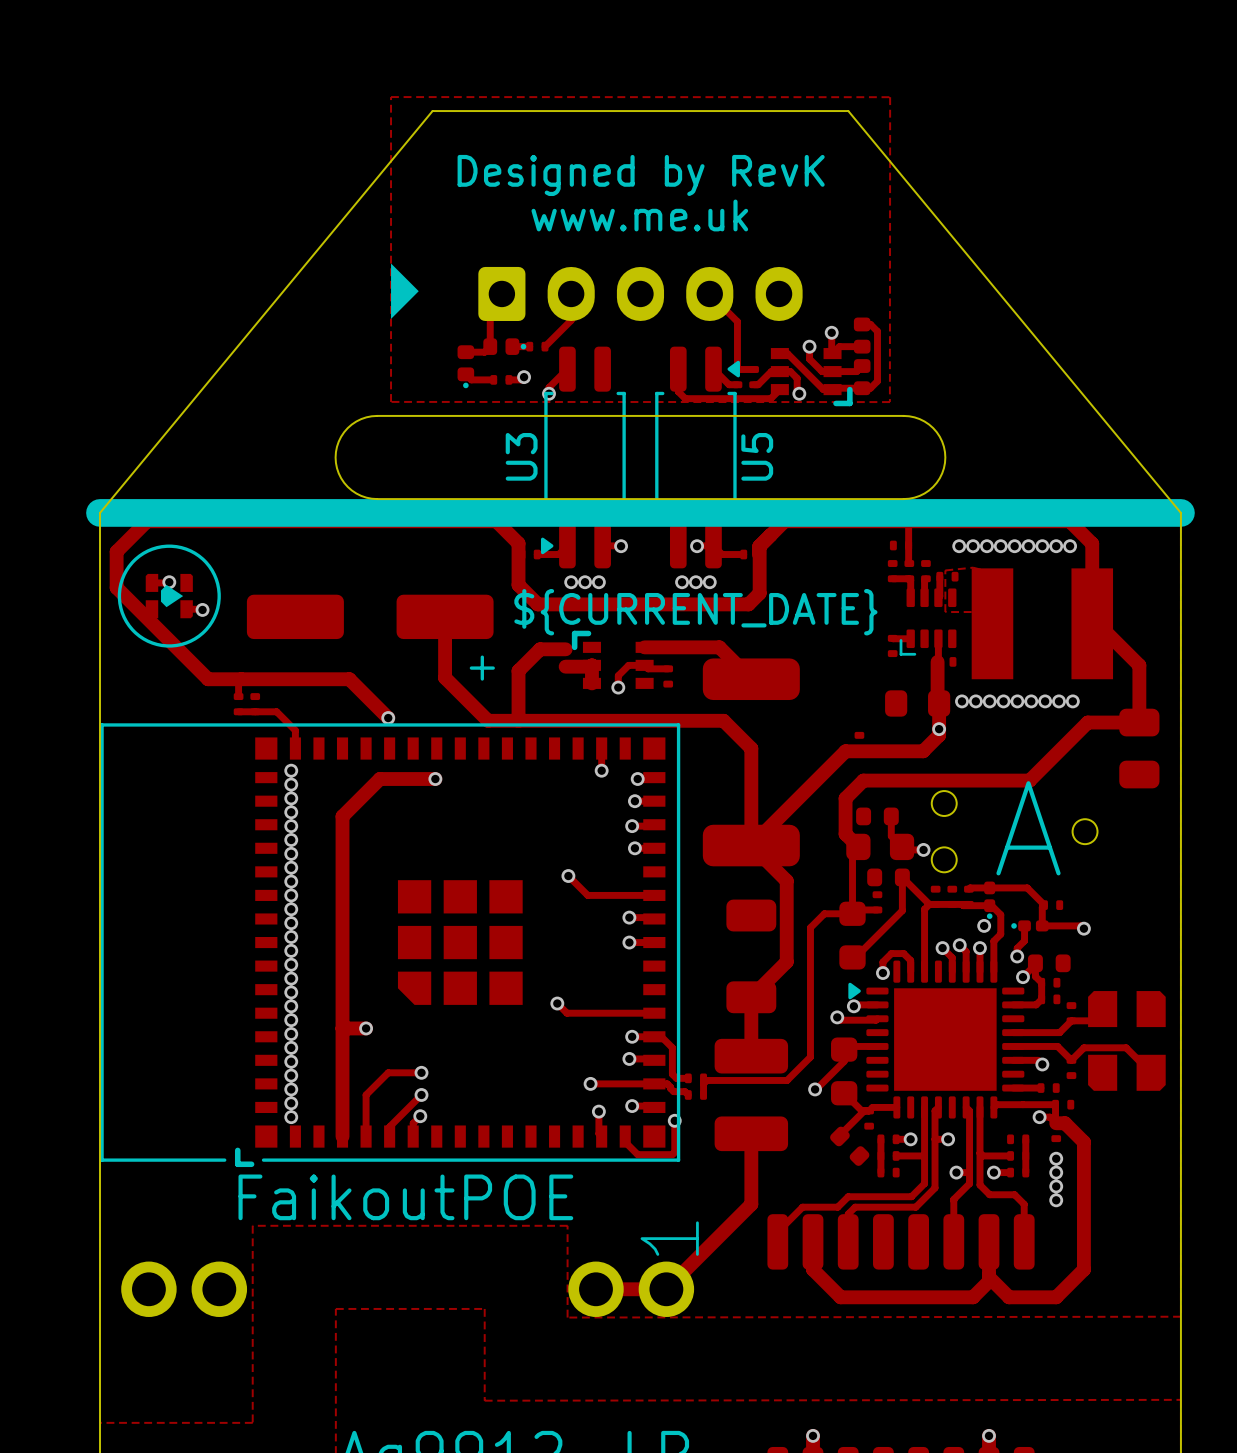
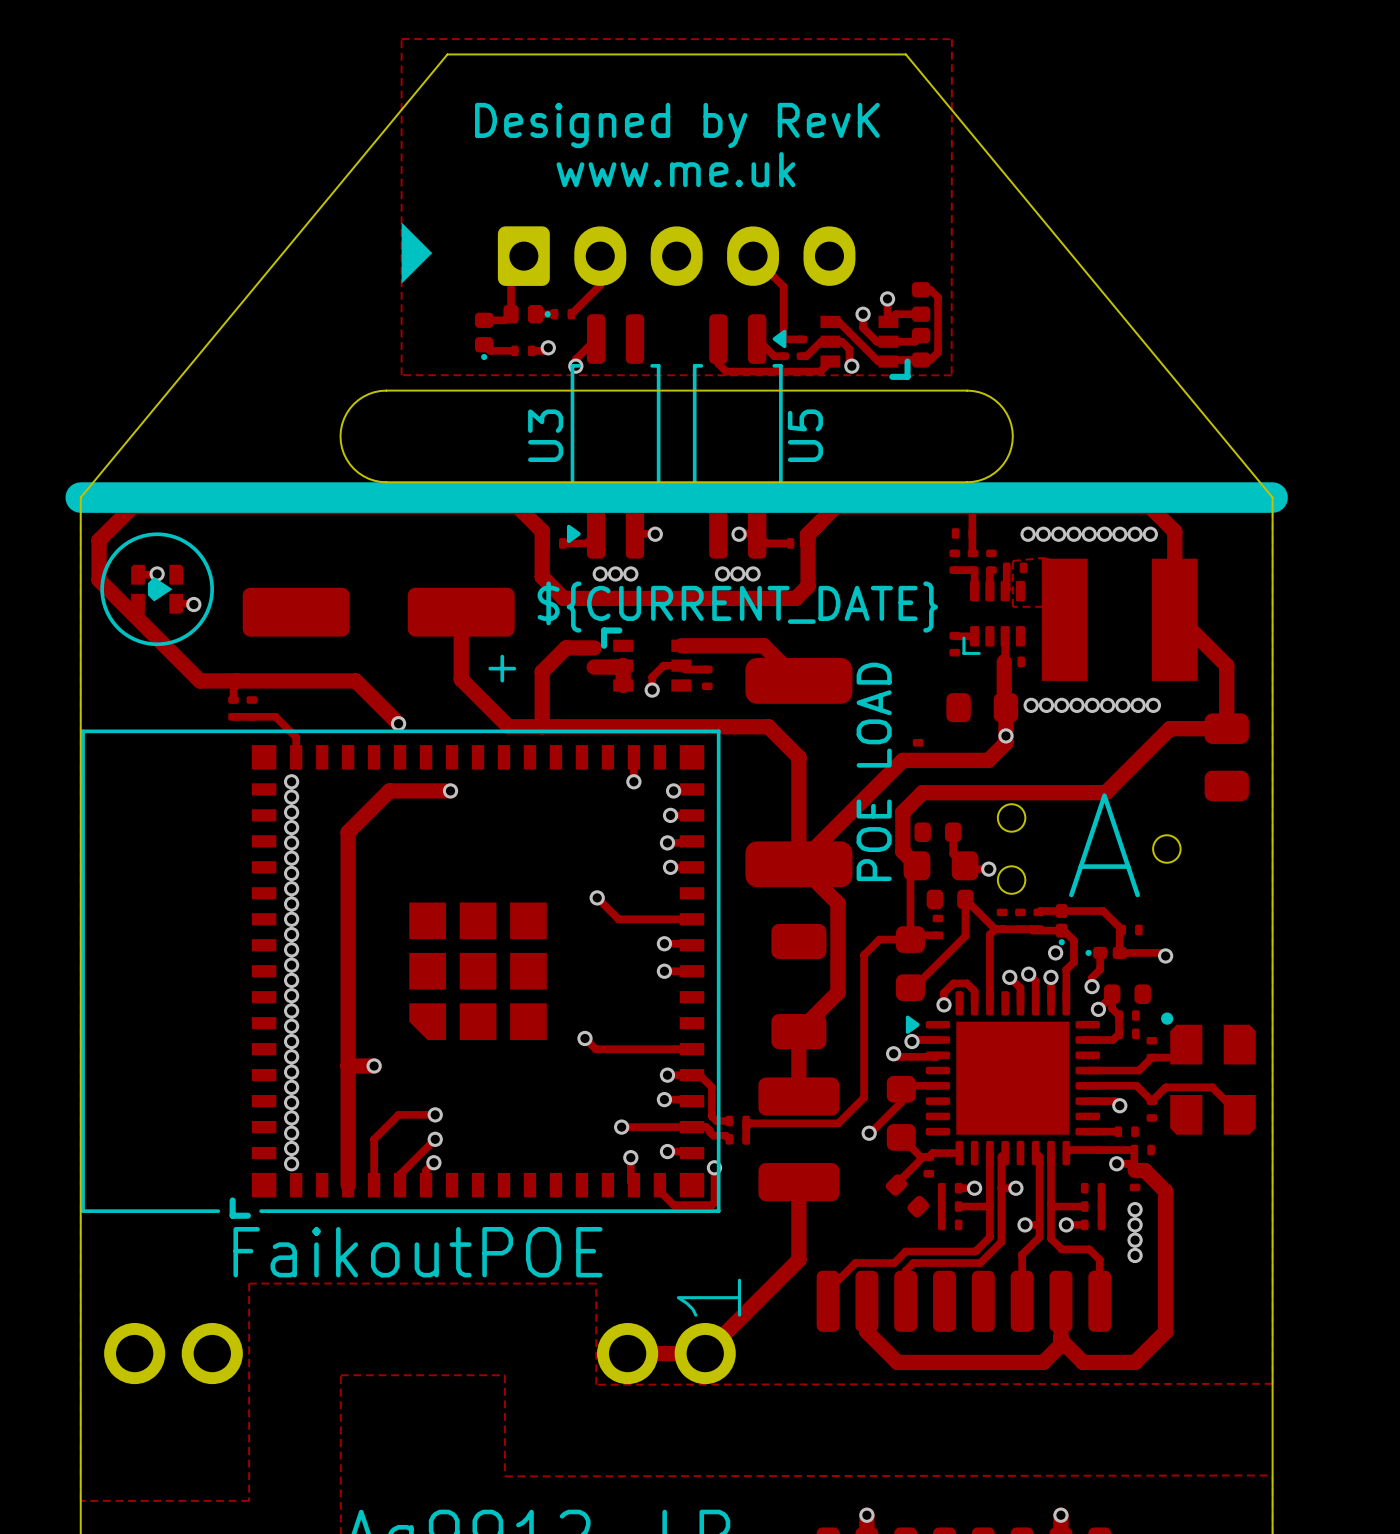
text: none -> POE LOAD (874, 771)
part footprint: [1088, 991, 1166, 1091] -> [1161, 1012, 1256, 1135]

